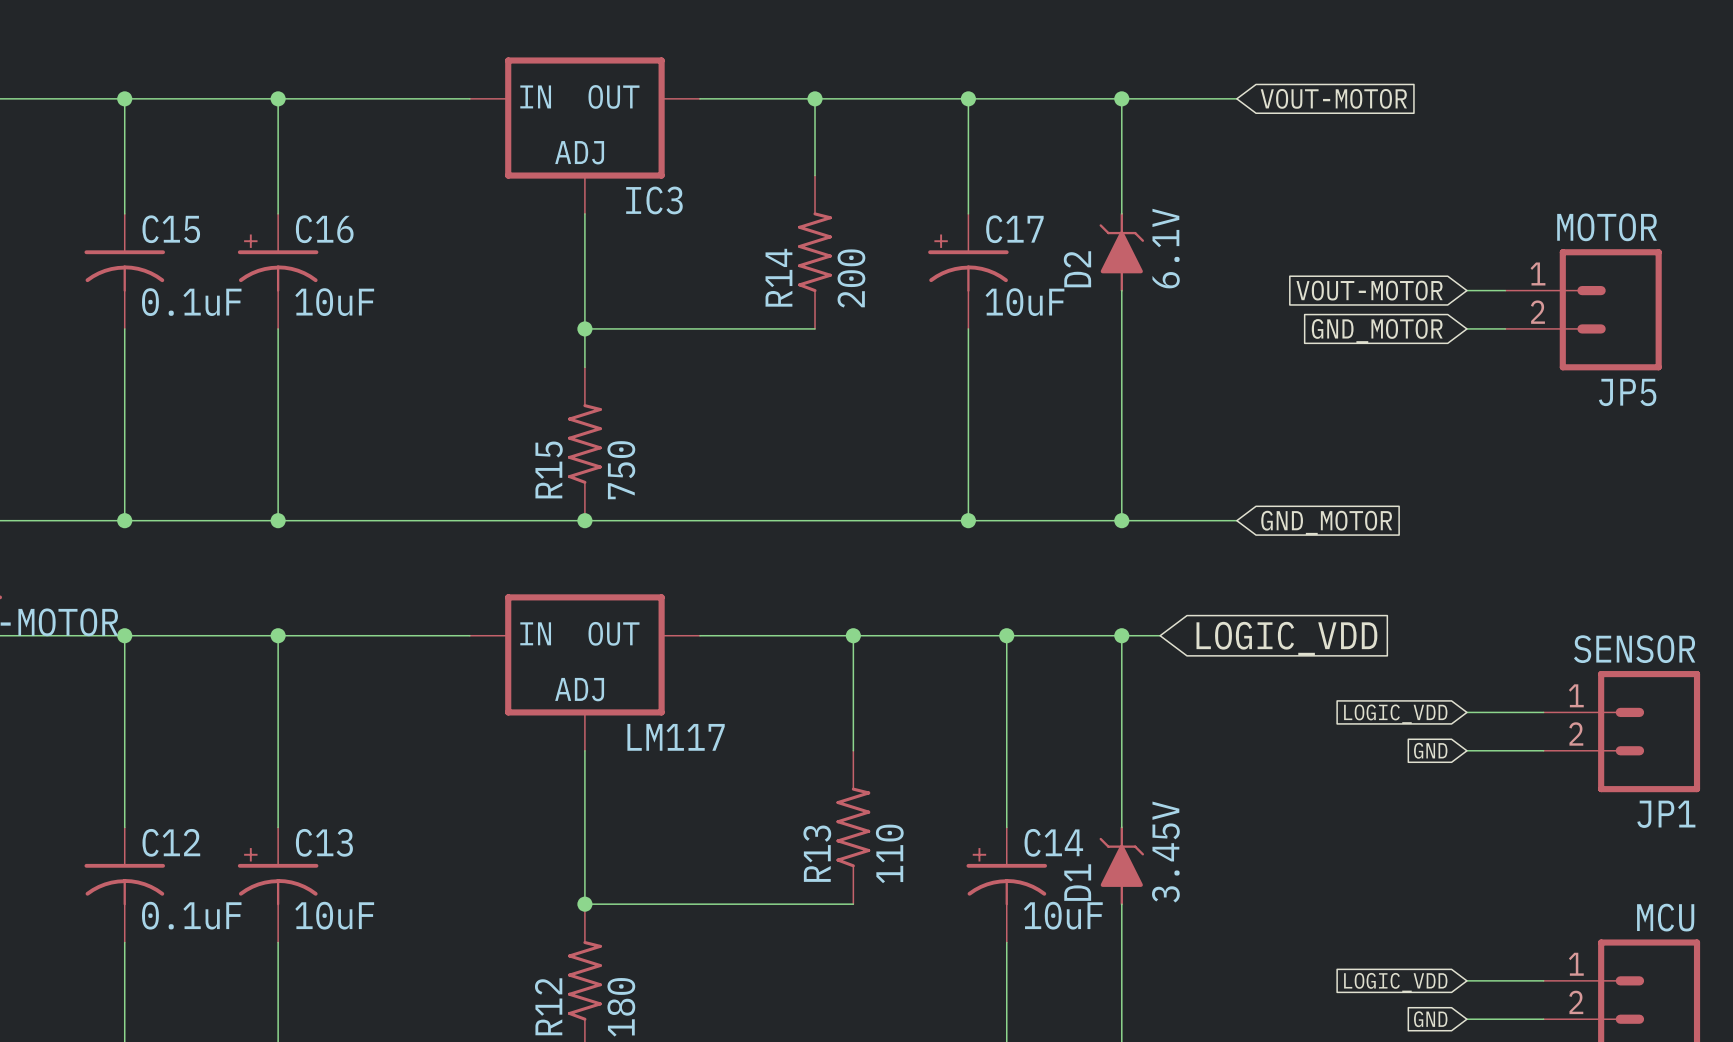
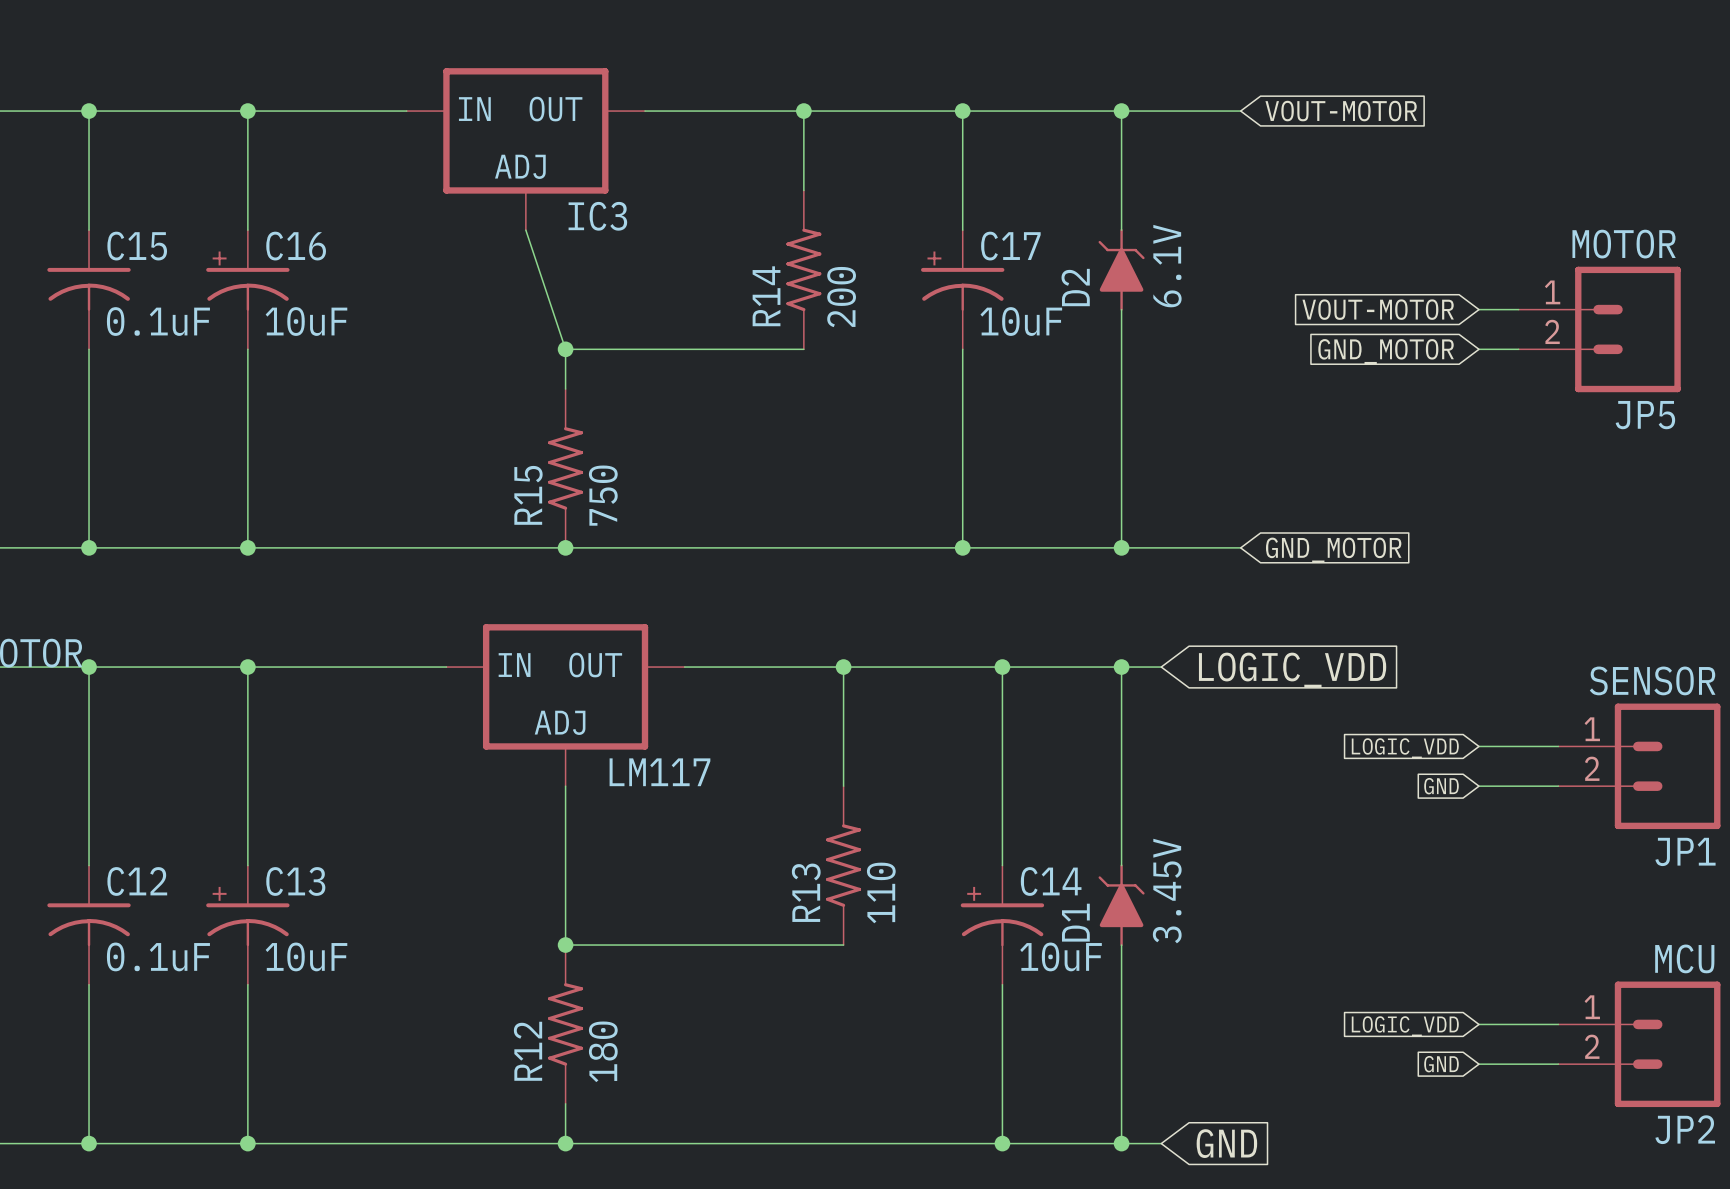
IC3 position: (584, 135) -> (525, 149)
wire: (584, 213) (584, 328) -> (525, 230) (565, 349)

